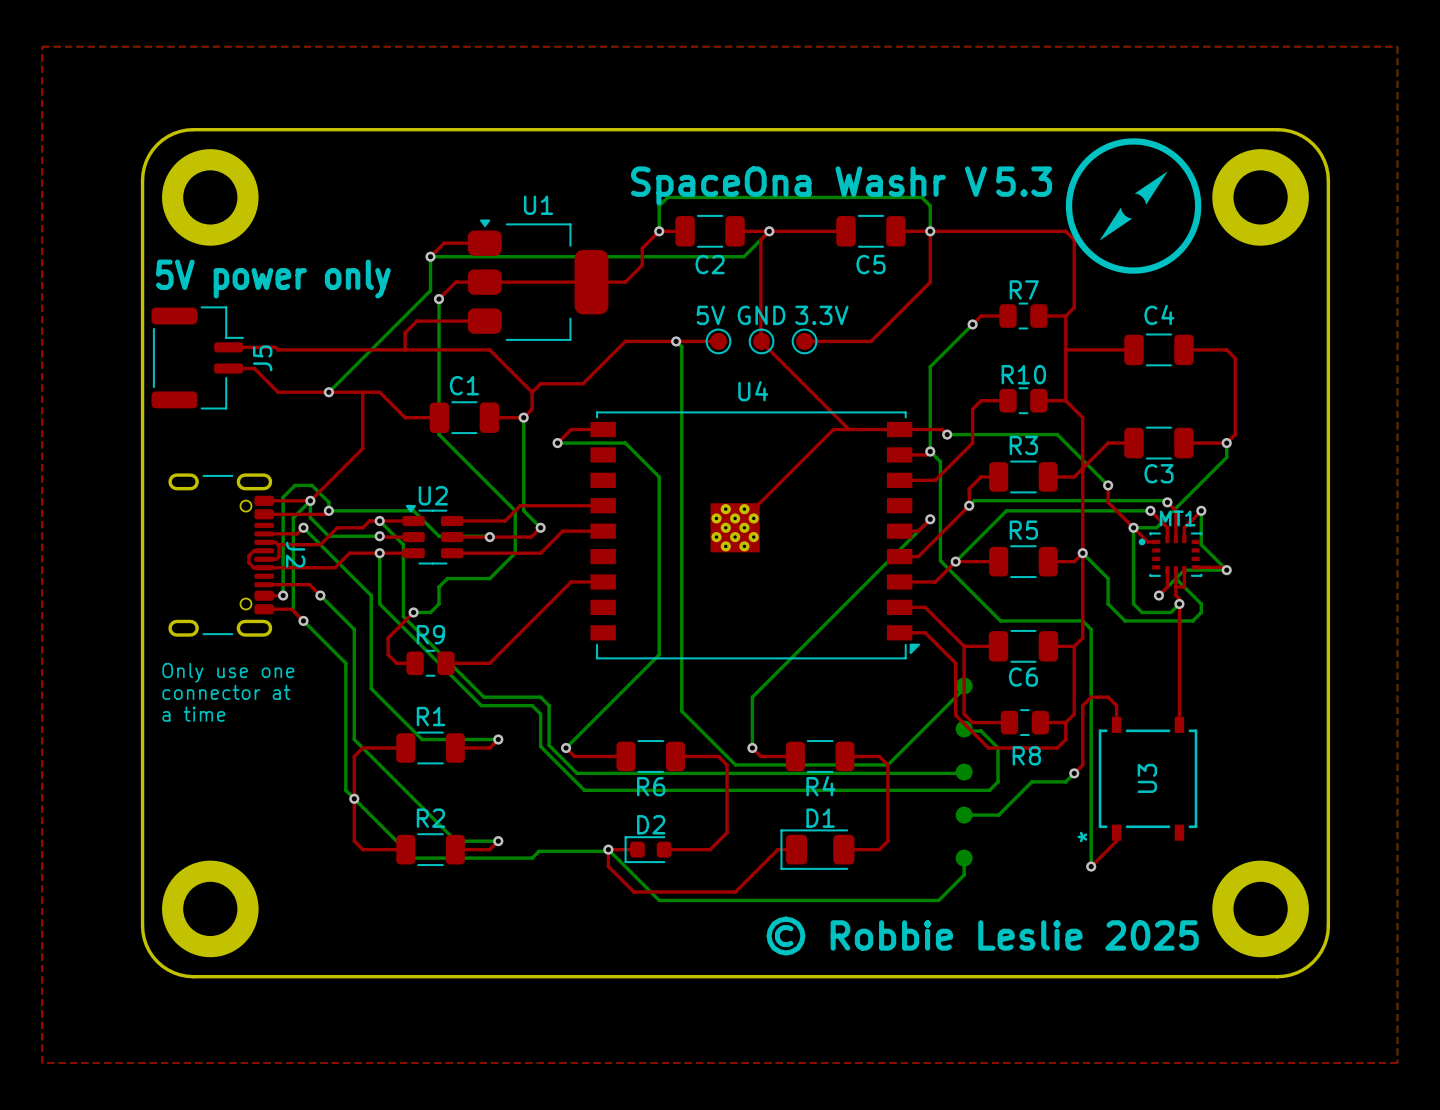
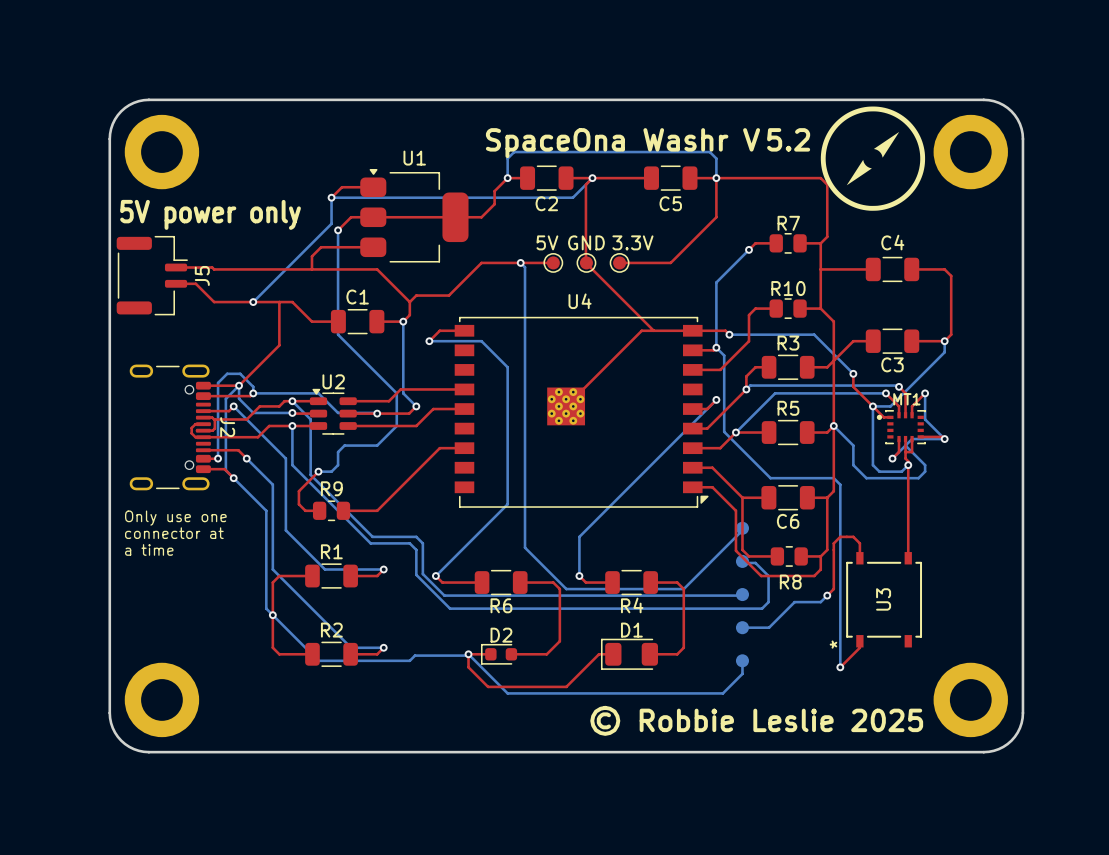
top zone outline: (42, 46) (1397, 46) (1397, 1063) (42, 1063) (42, 46) -> none
text: SpaceOna Washr V 5.3 (841, 185) -> SpaceOna Washr V 5.2 (648, 143)

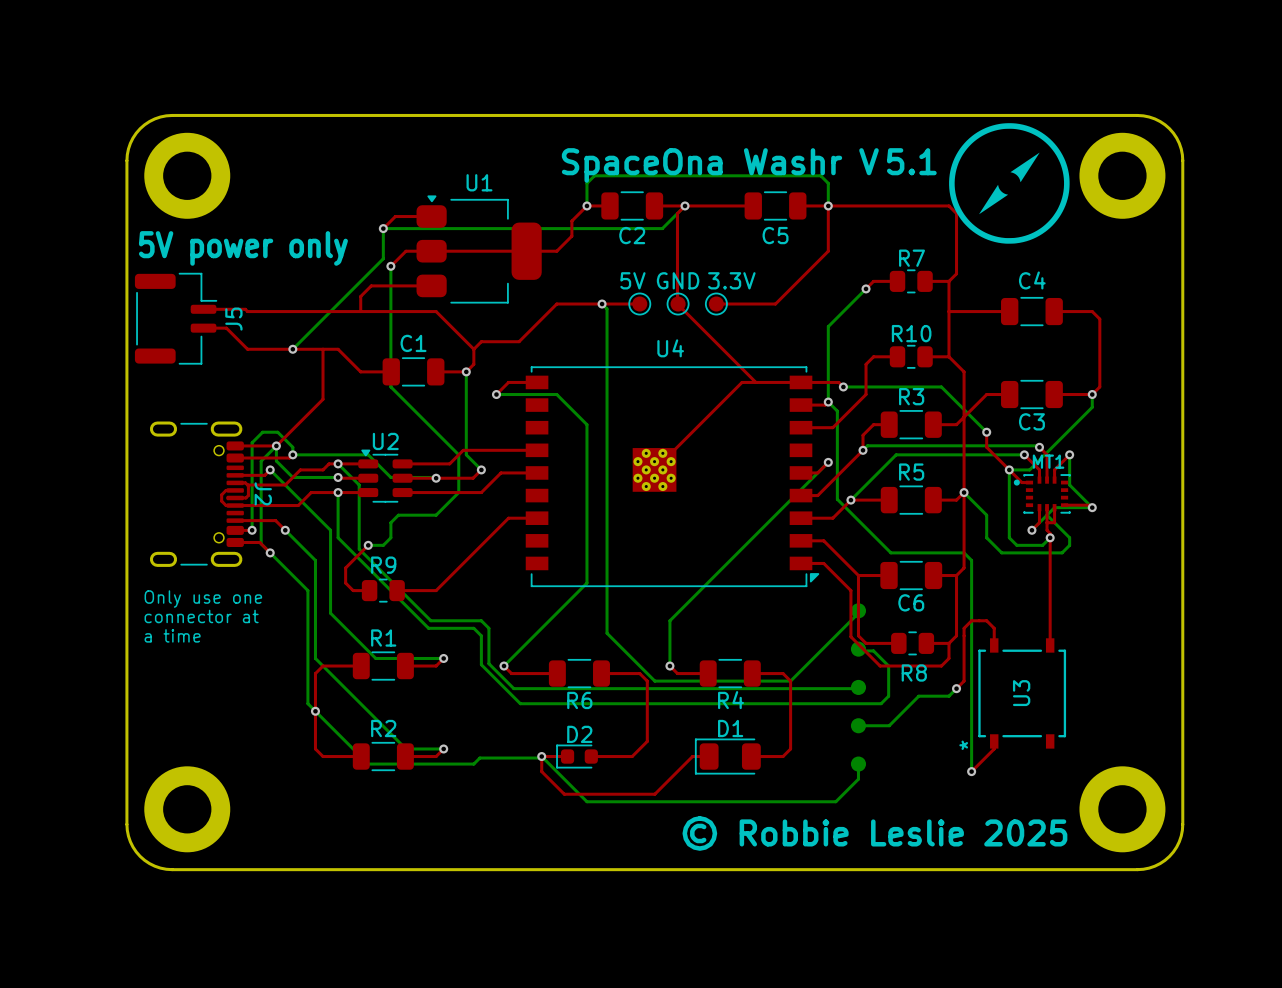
text: SpaceOna Washr V 5.2 (648, 143) -> SpaceOna Washr V 5.1 (749, 165)

